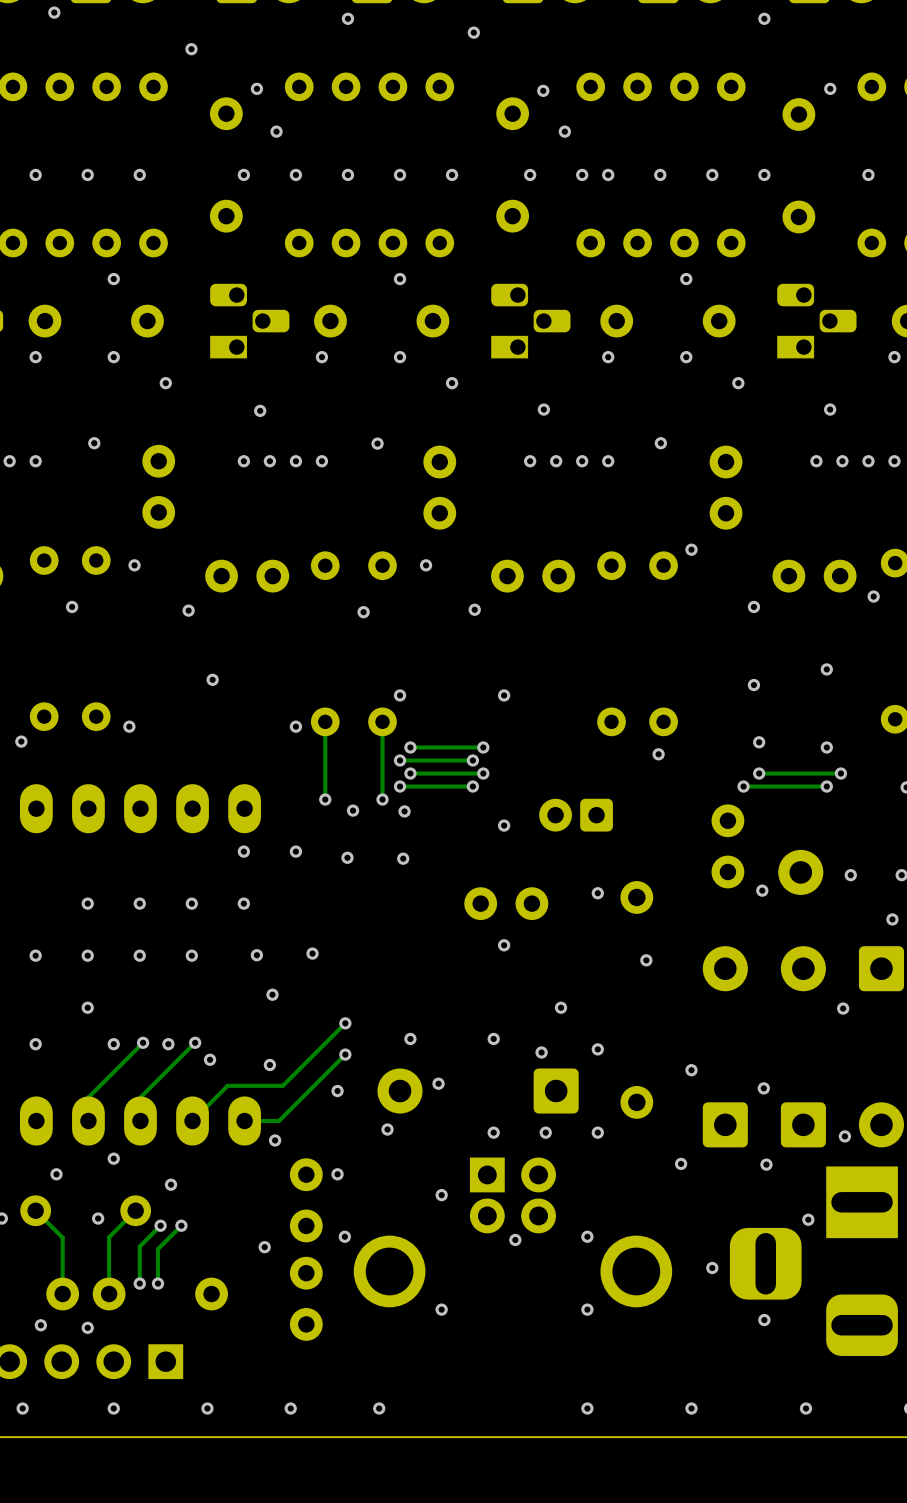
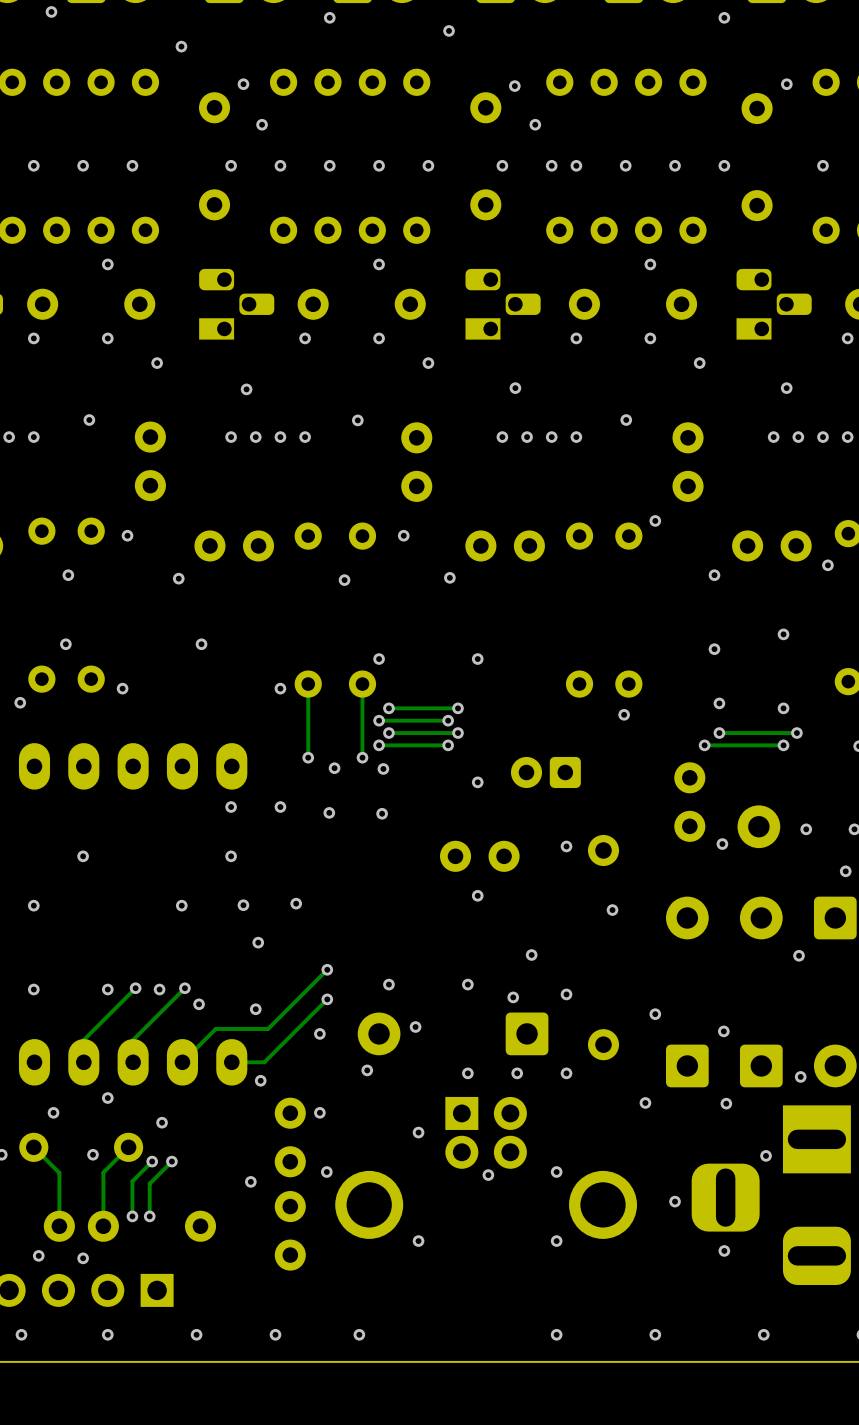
via: none -> (65, 644)
via: (139, 903) -> none
via: (191, 903) -> none
via: (87, 955) -> none
via: (139, 955) -> none
via: (87, 1007) -> none

